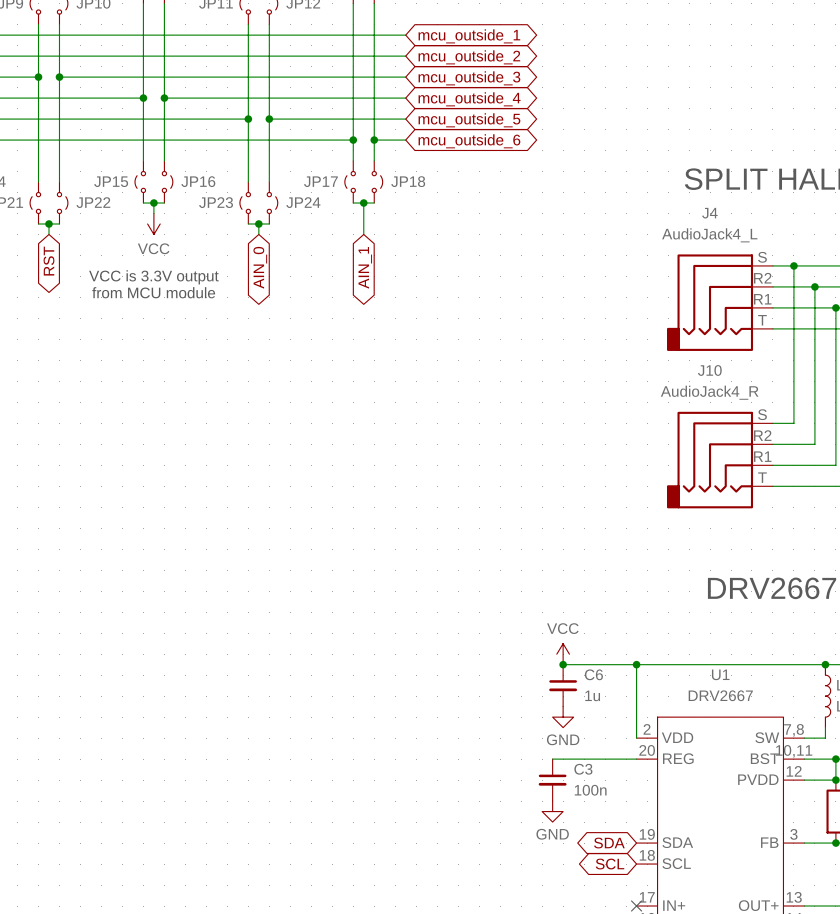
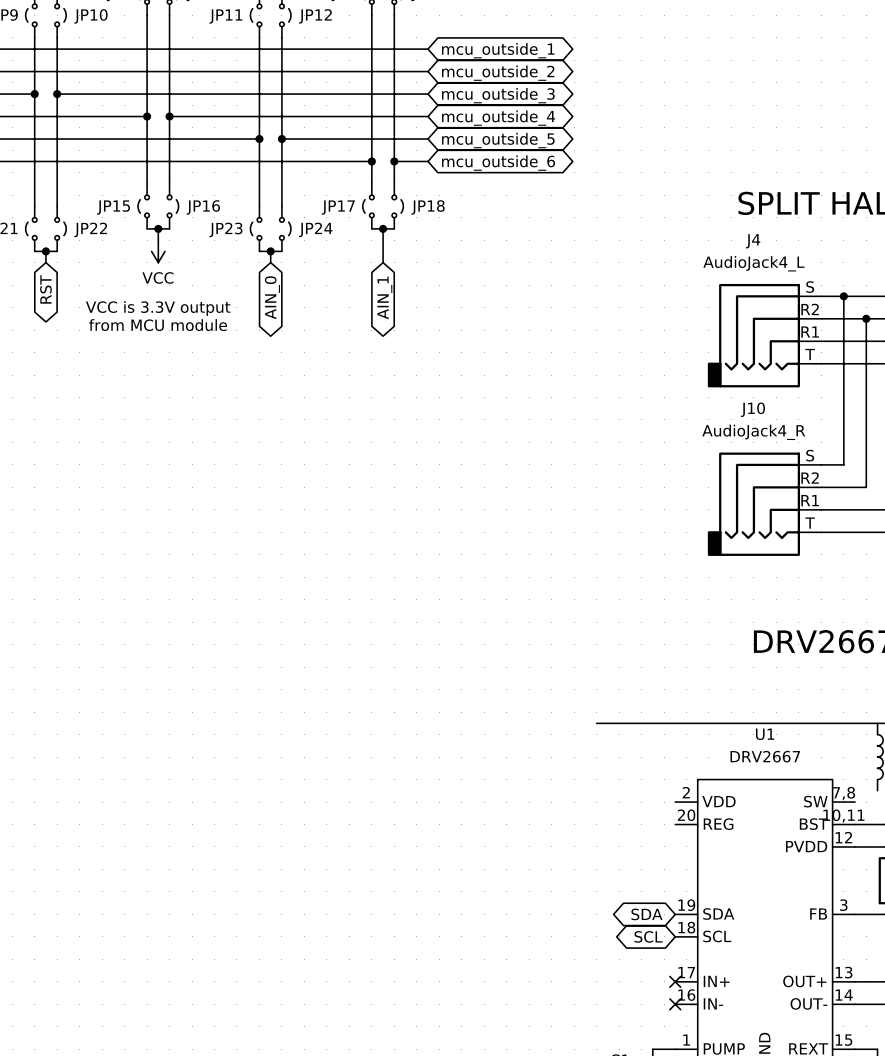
power symbol: VCC (563, 654) -> none
junction: (563, 664) -> none
wire: (636, 664) (636, 738) -> none
junction: (636, 664) -> none
junction: (825, 664) -> none
C6: 1u (563, 685) -> none
power symbol: GND (563, 717) -> none
wire: (825, 727) (825, 738) (804, 738) -> none
wire: (552, 759) (636, 759) -> none
C3: 100n (552, 780) -> none
power symbol: GND (552, 811) -> none

